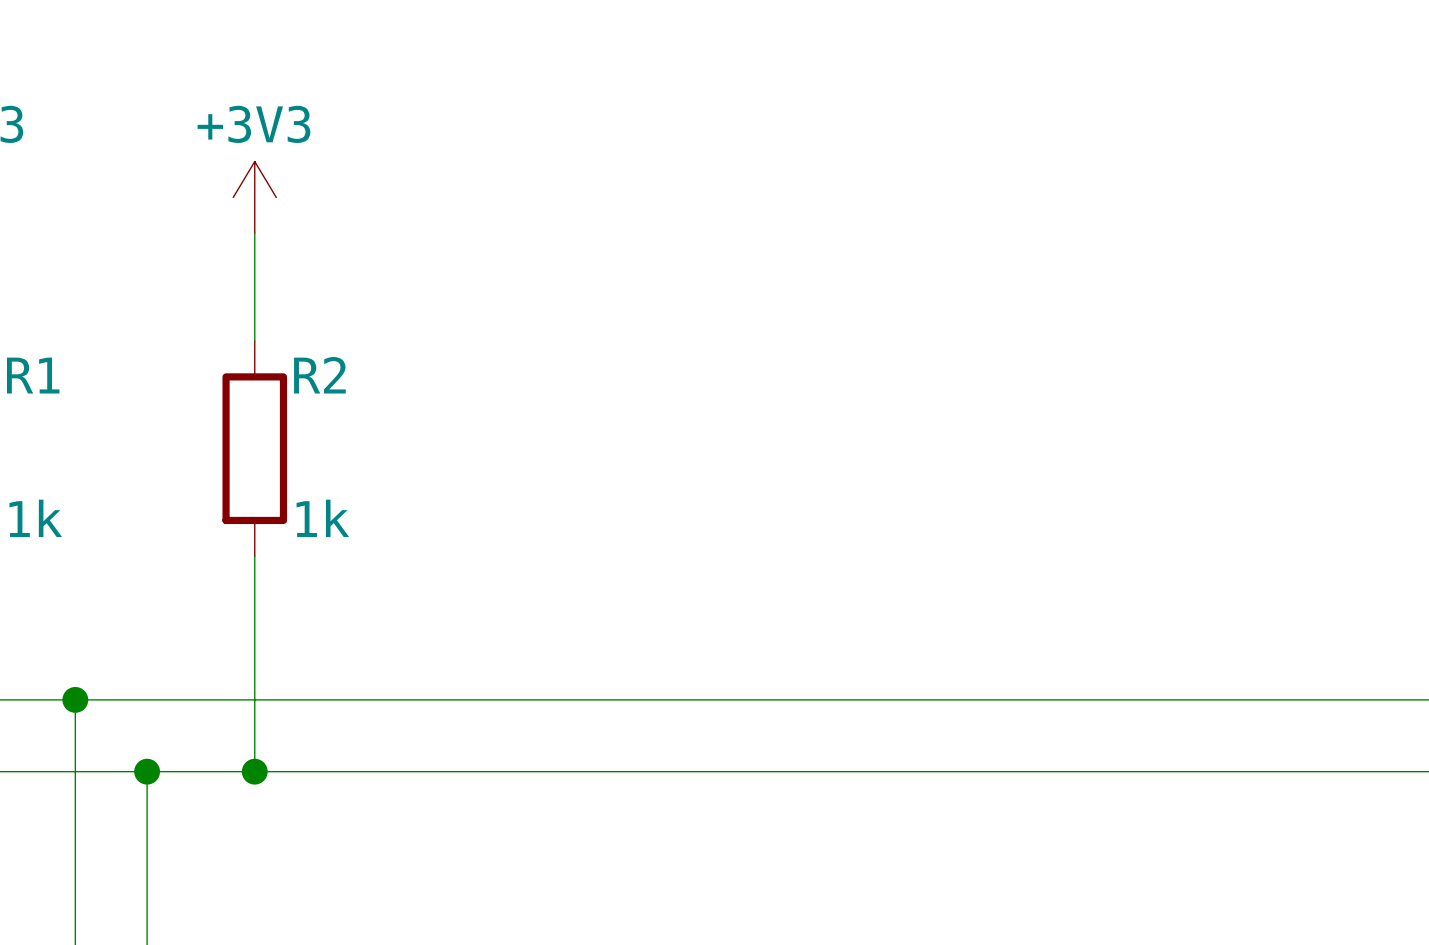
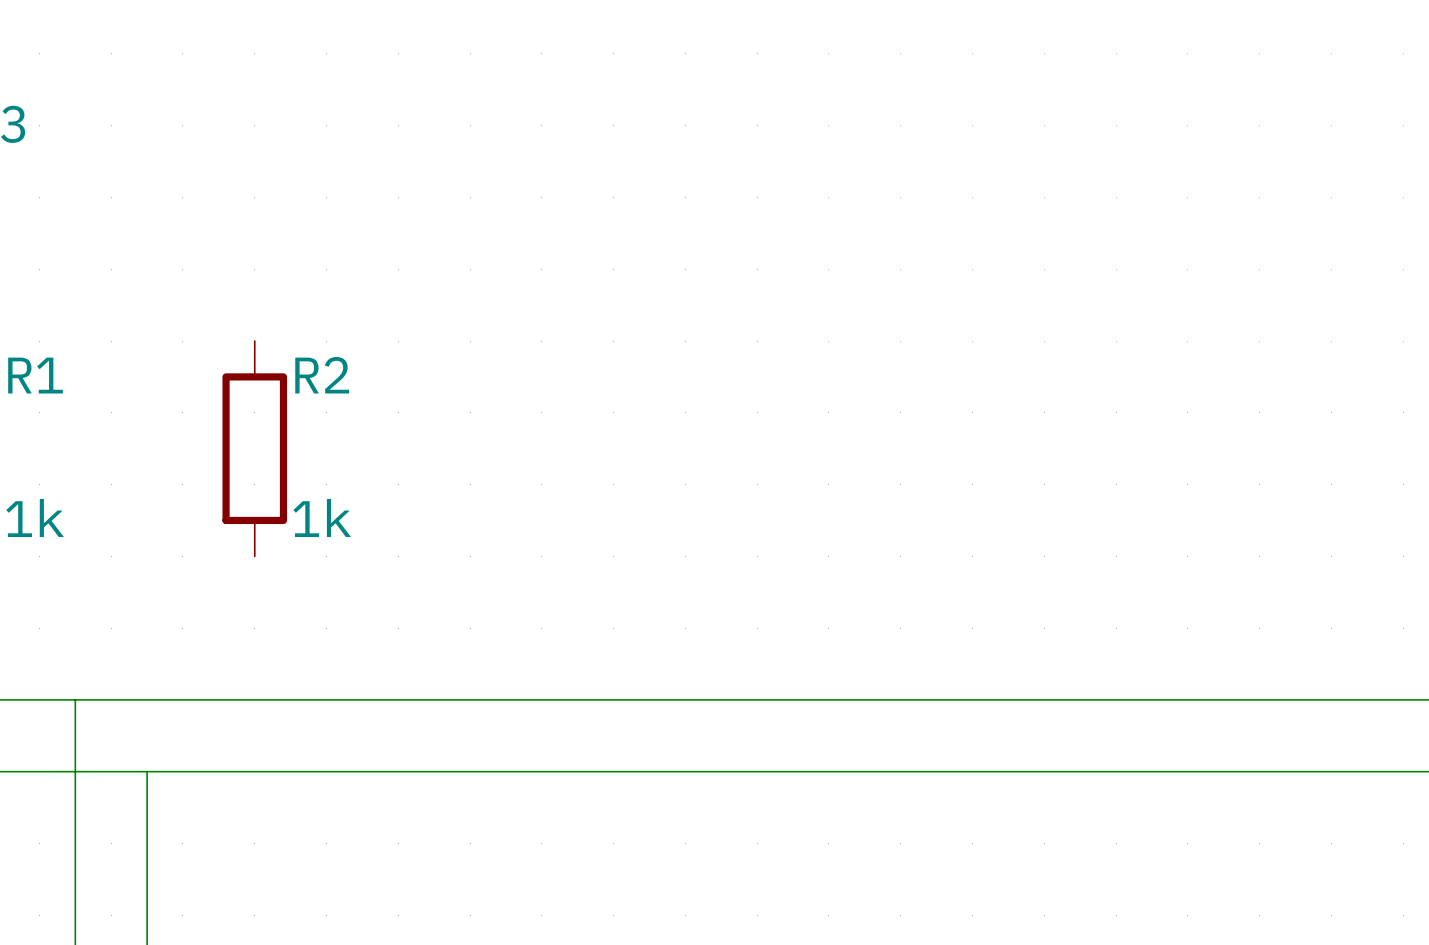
power symbol: +3V3 (254, 197) -> none
wire: (254, 233) (254, 341) -> none
wire: (254, 556) (254, 771) -> none
junction: (75, 699) -> none
junction: (147, 771) -> none
junction: (254, 771) -> none

